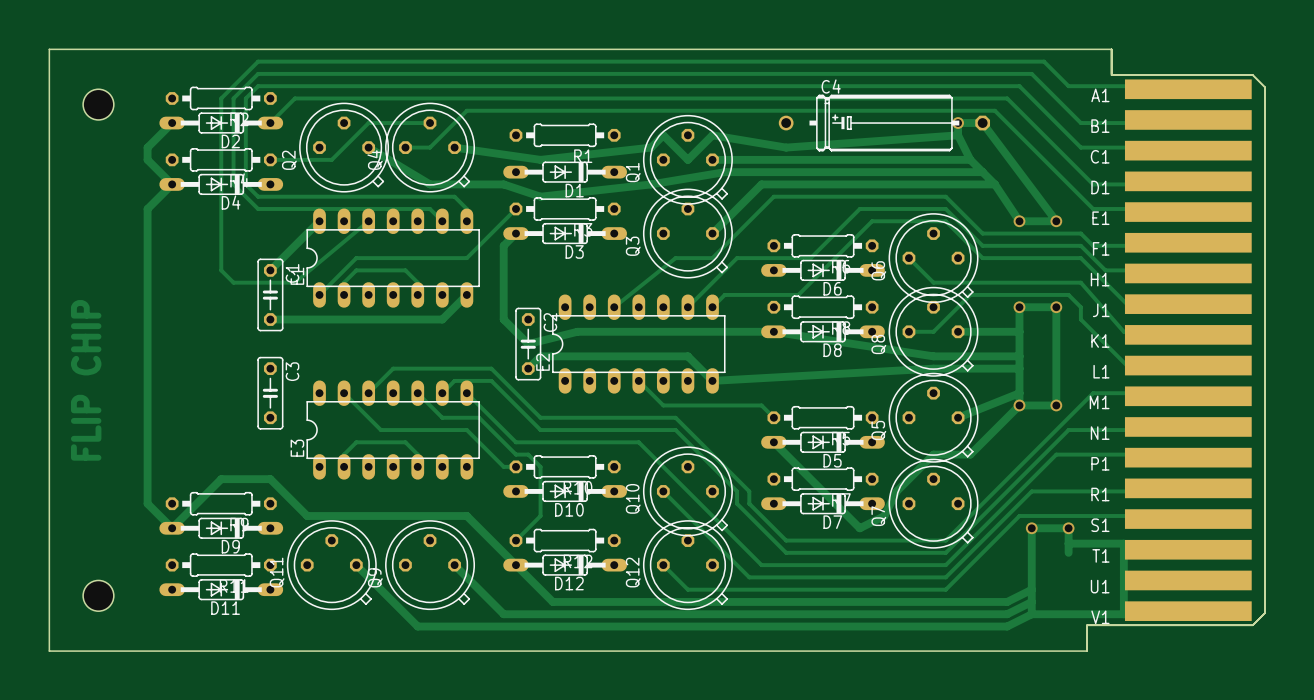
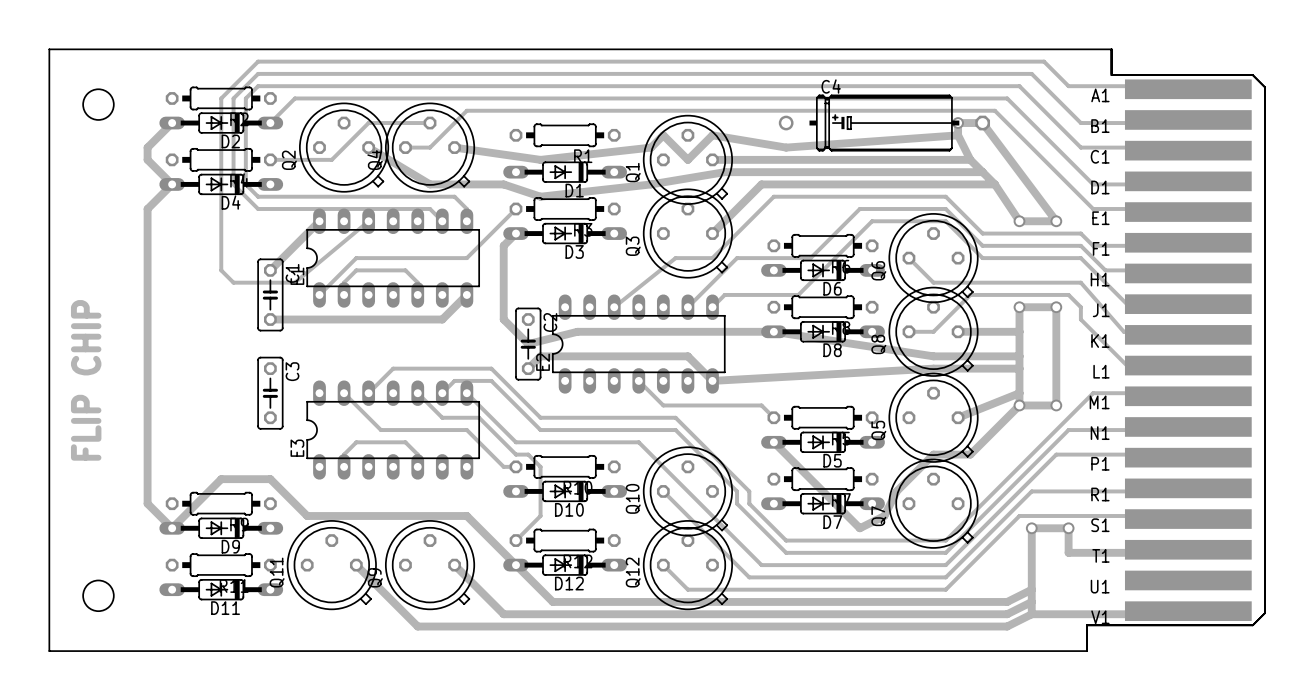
track: (1068, 543) (1123, 543) (1123, 614) -> none
track: none -> (1068, 552) (1123, 552)

